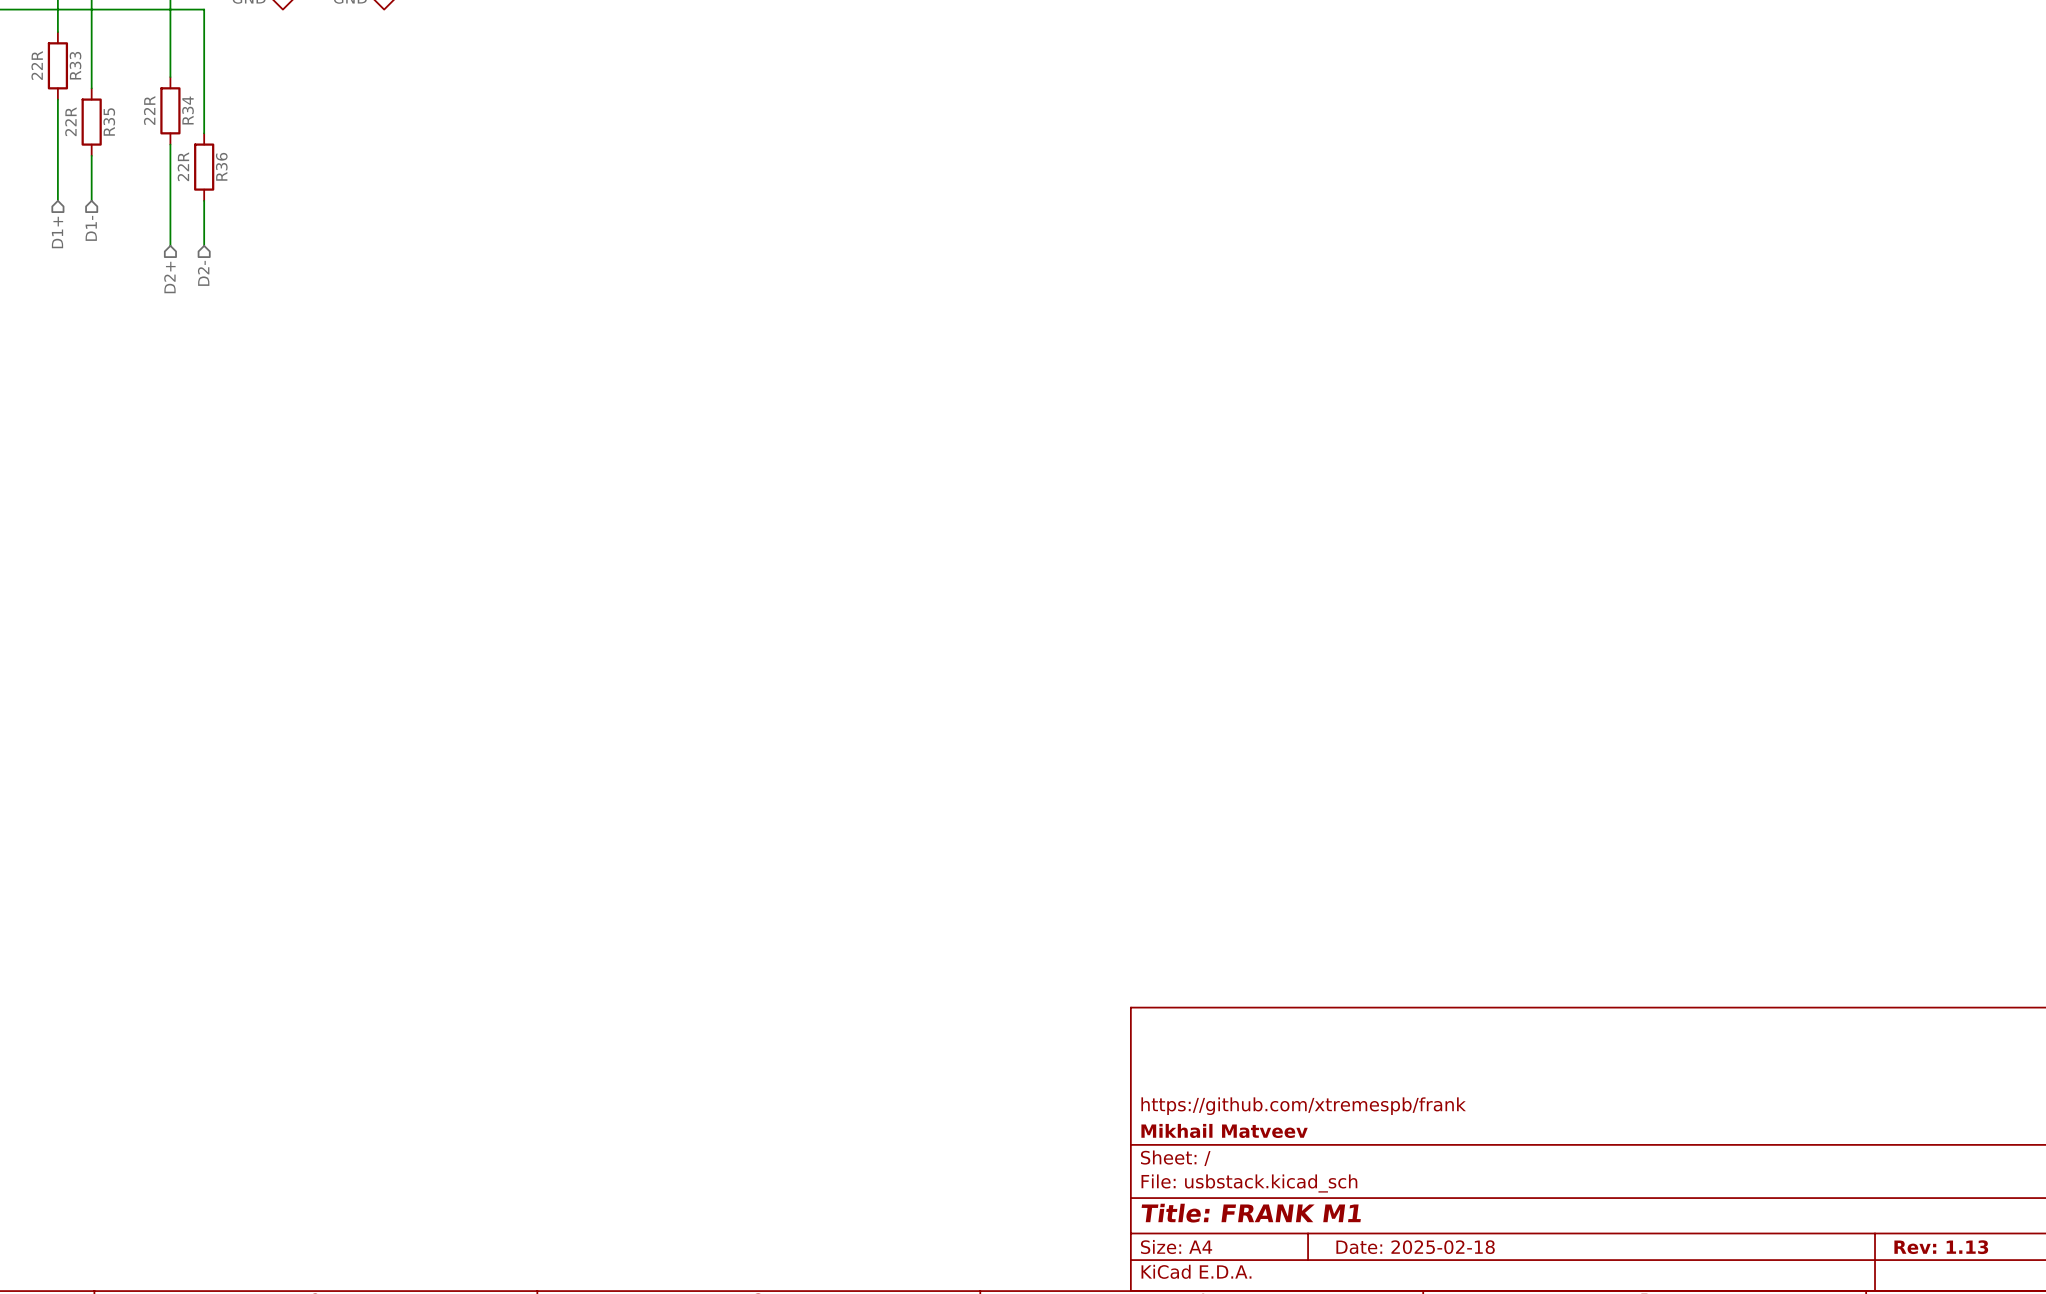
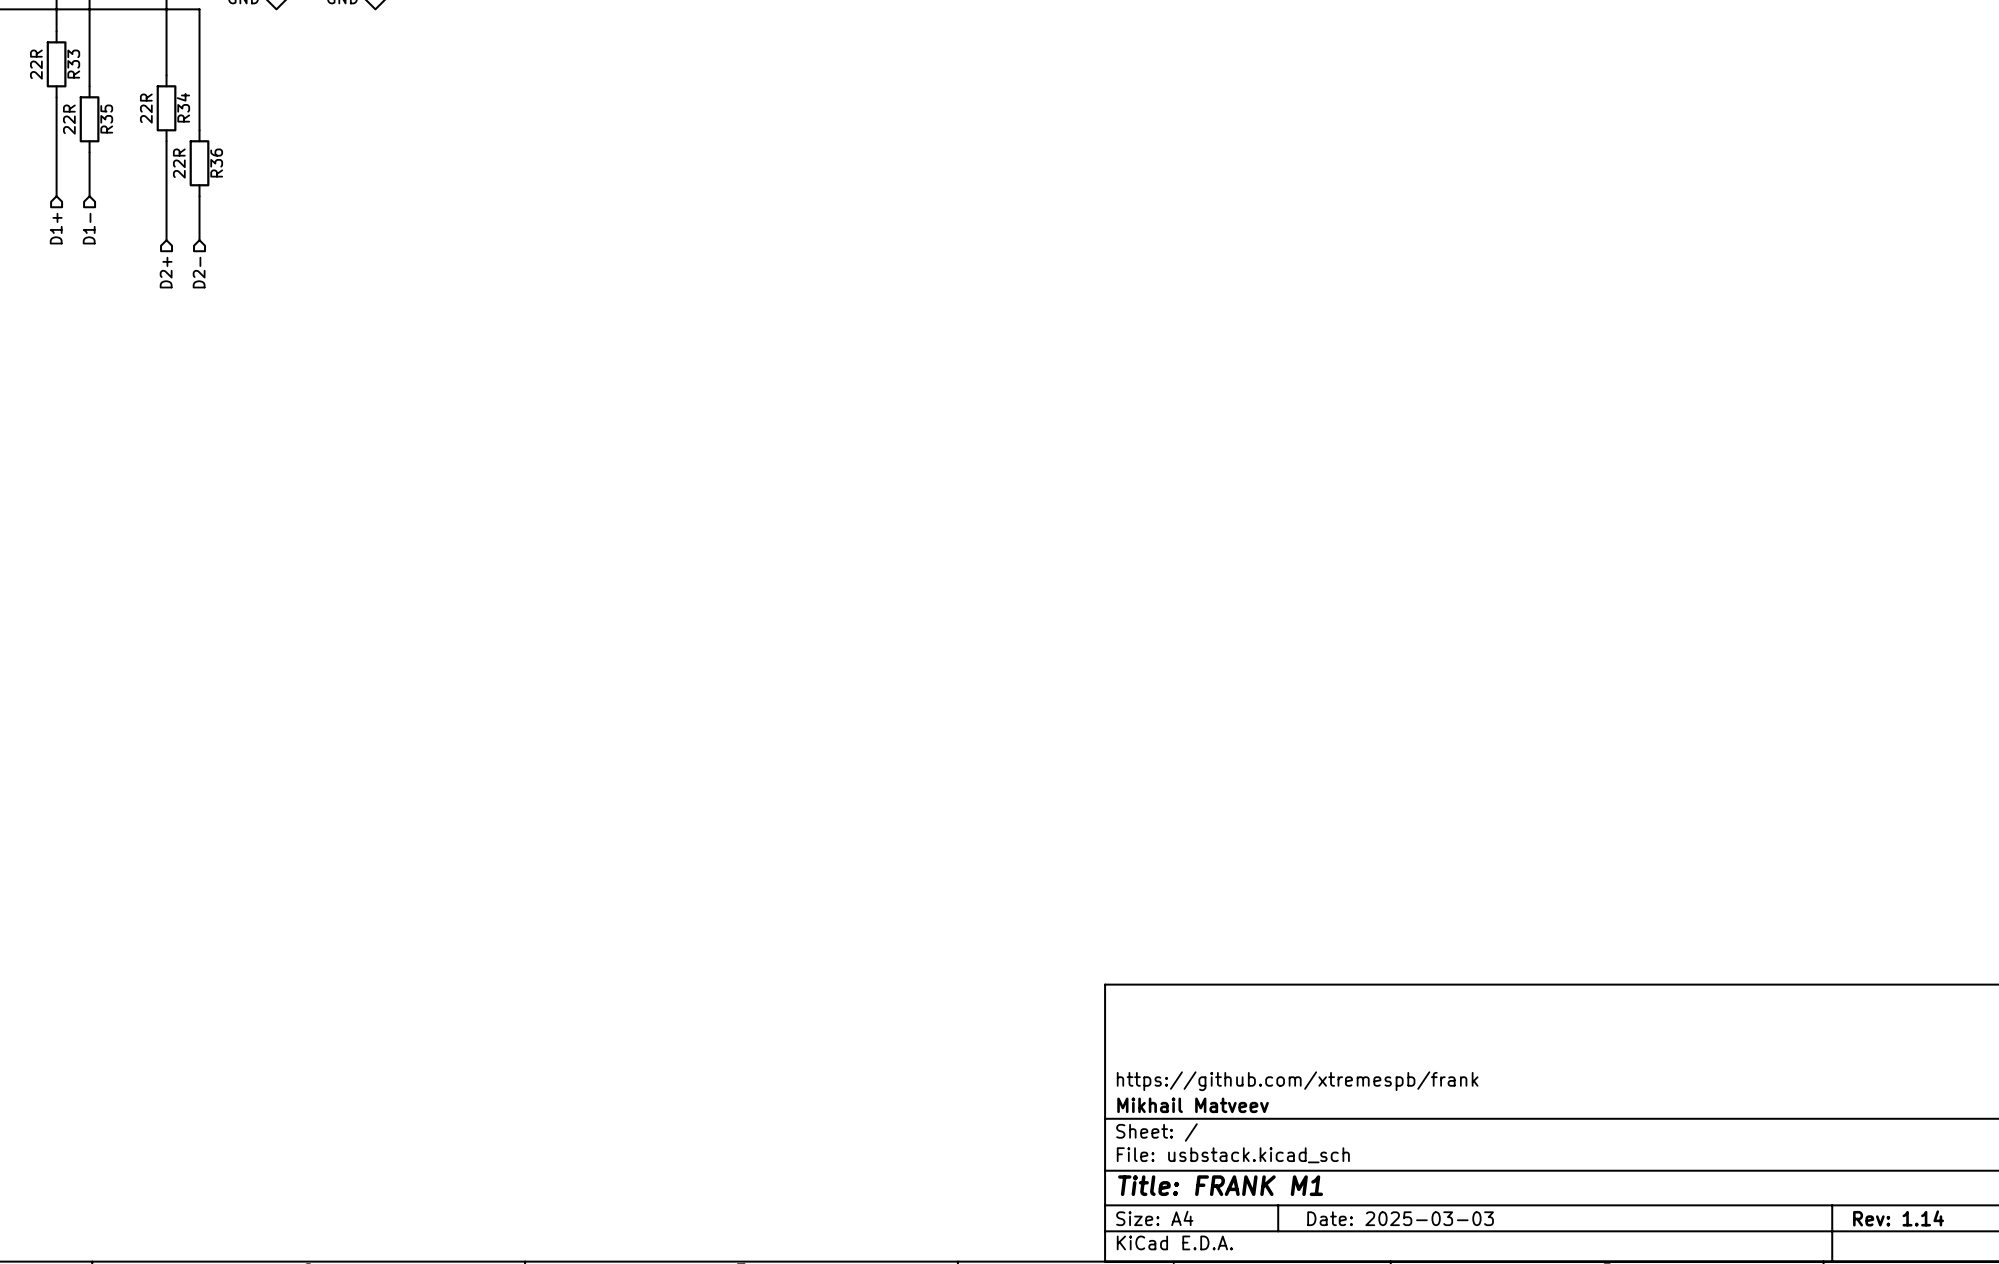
title block: Date: 2025-02-18 (1415, 1247) -> Date: 2025-03-03 (1400, 1218)
title block: Rev: 1.13 (1941, 1247) -> Rev: 1.14 (1898, 1218)

